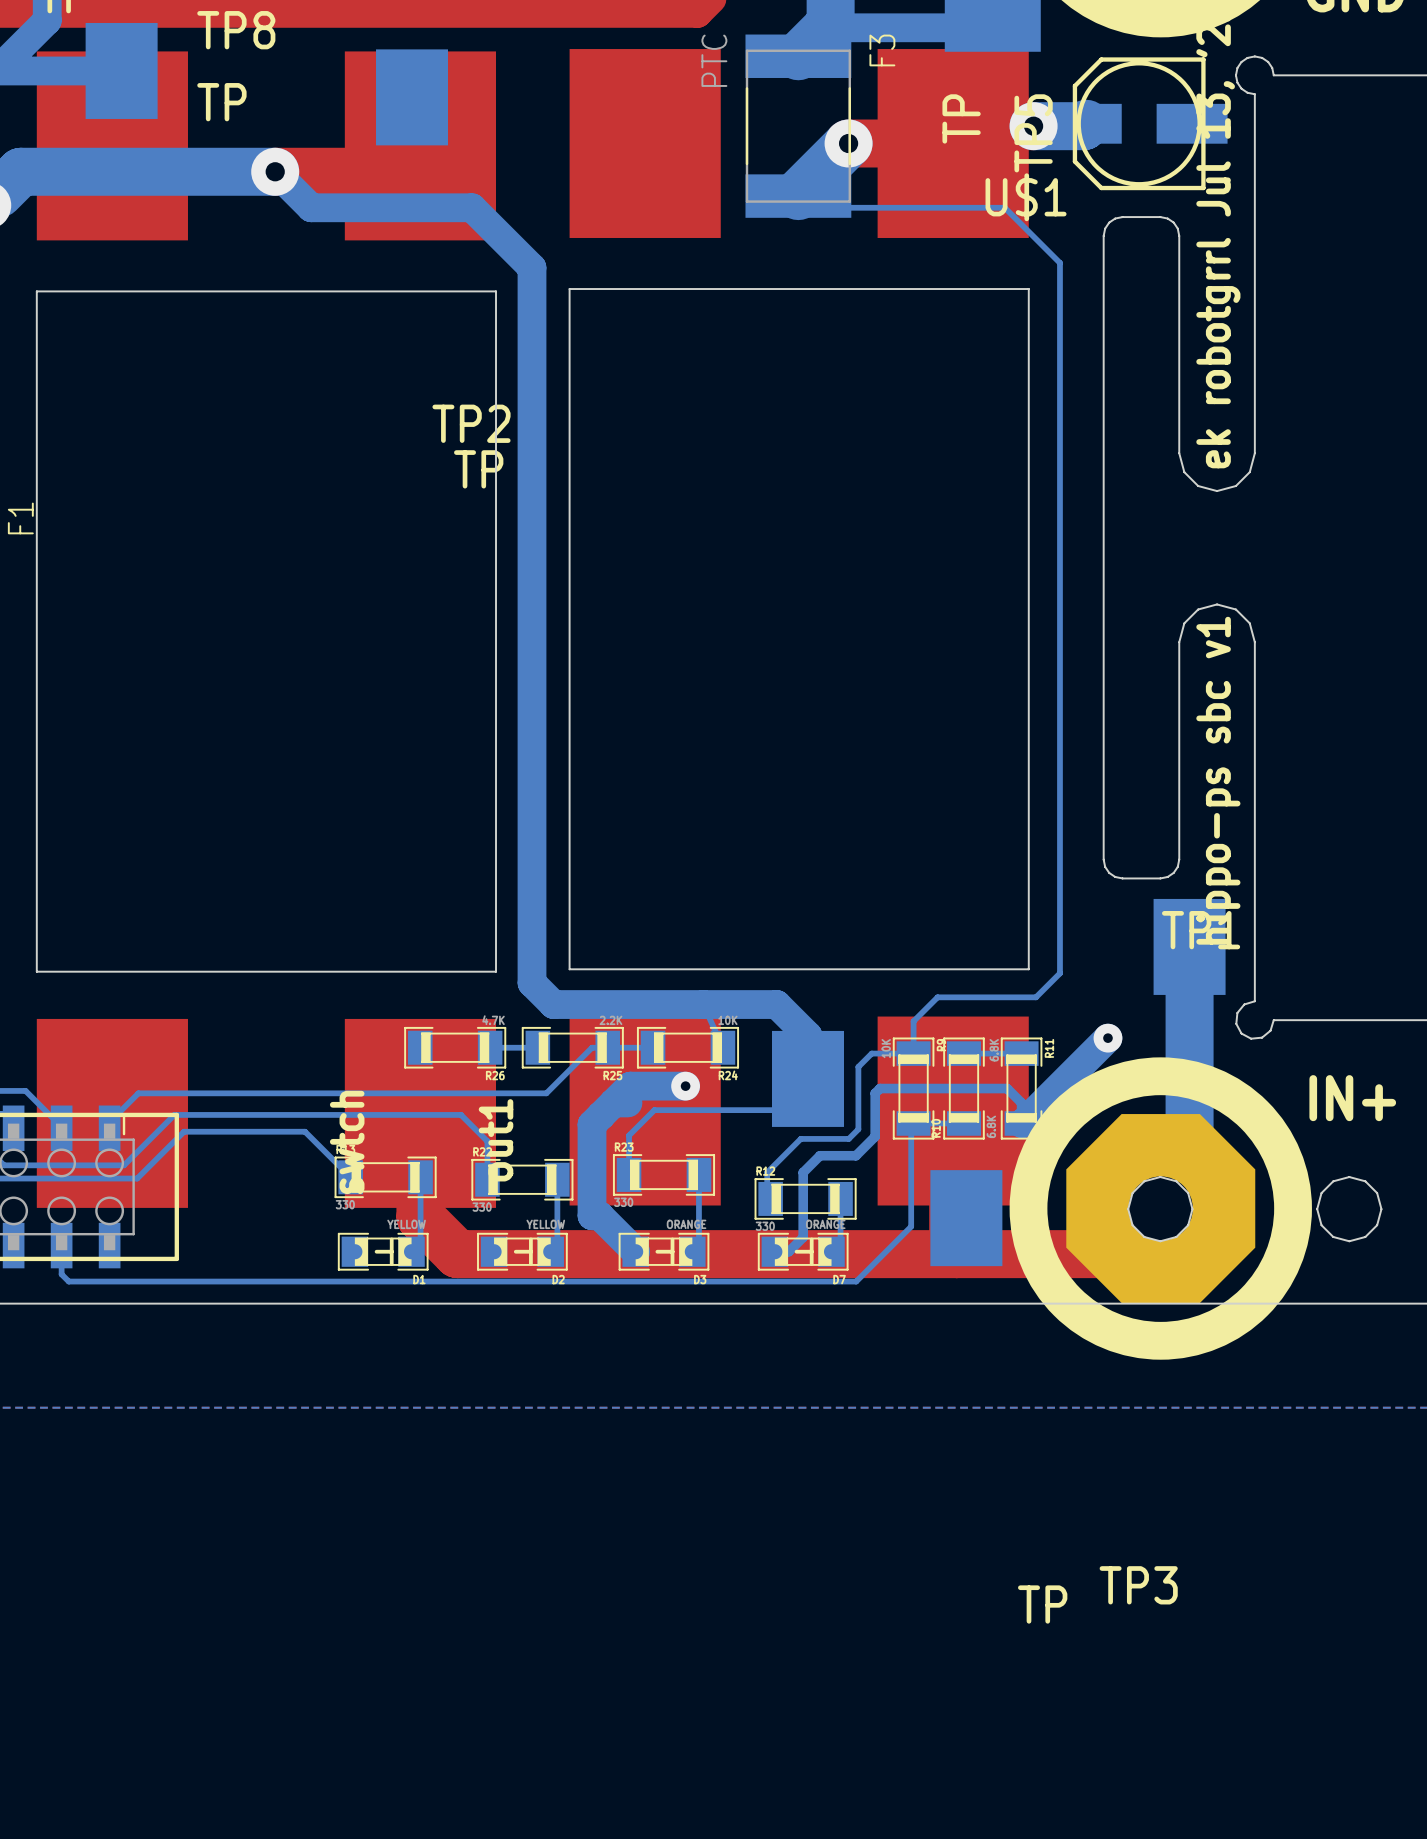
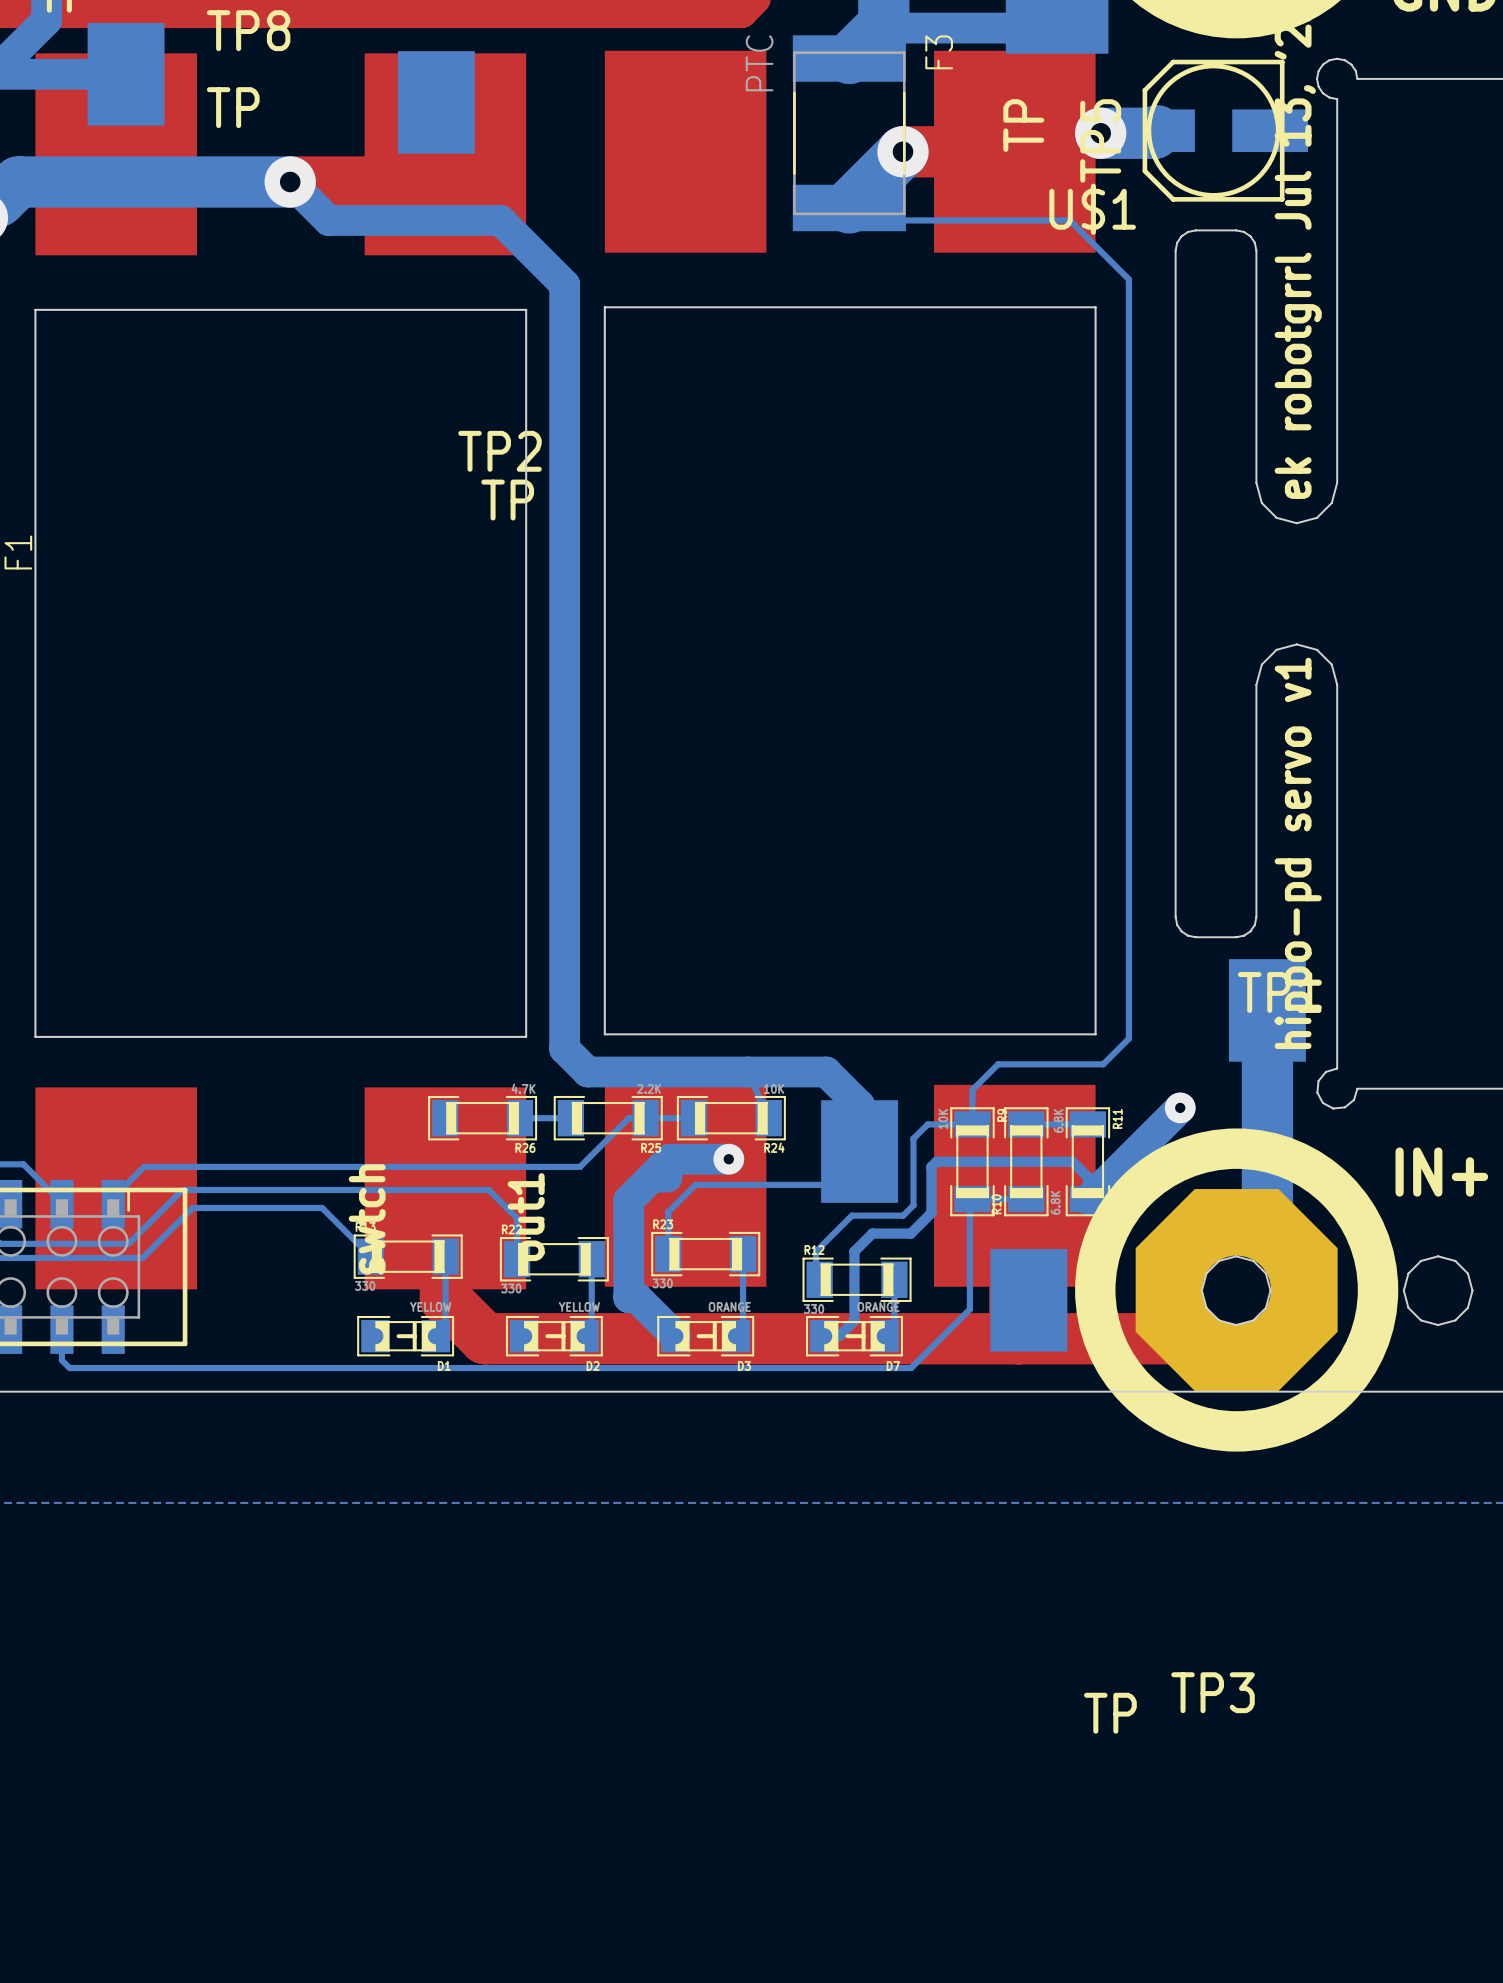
text: hippo-ps sbc v1 (1218, 780) -> hippo-pd servo v1 (1298, 853)

